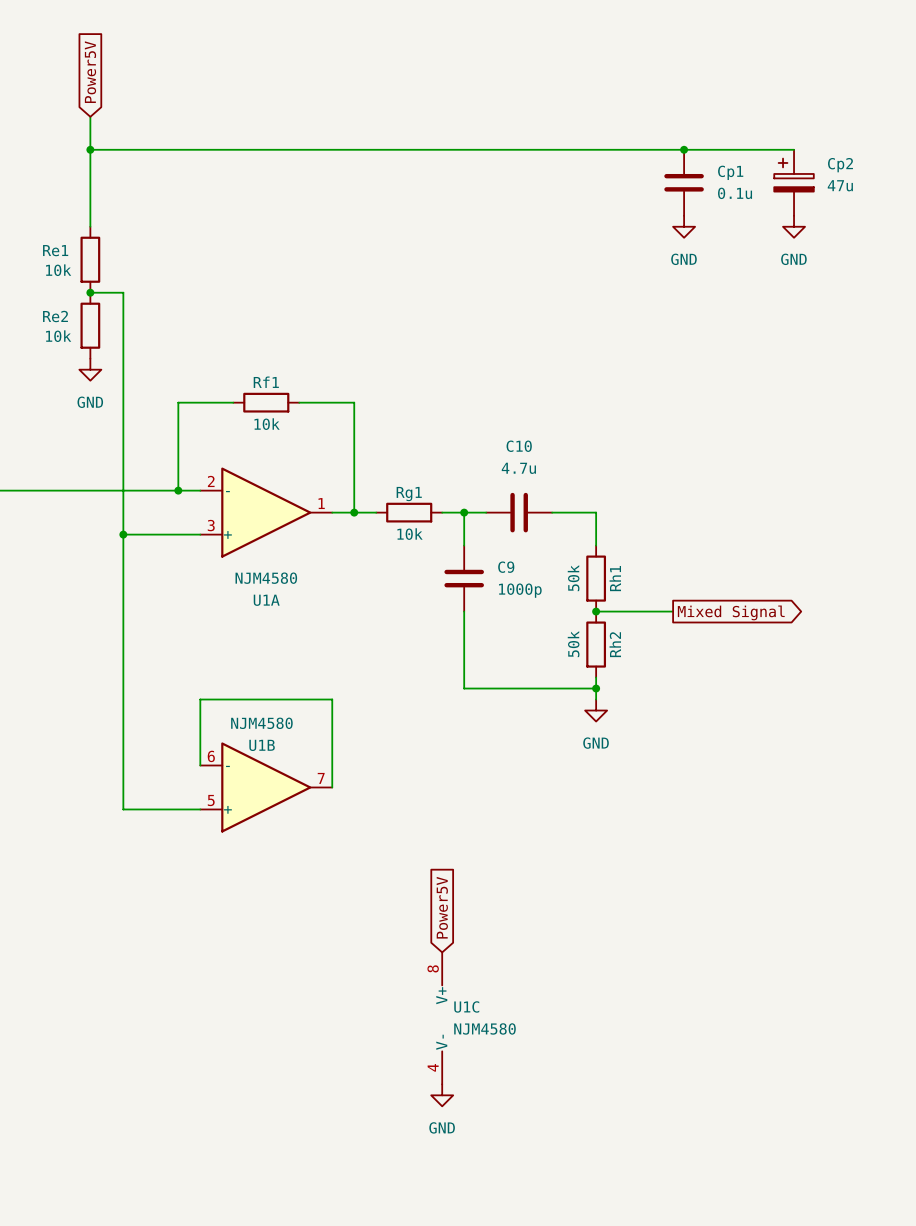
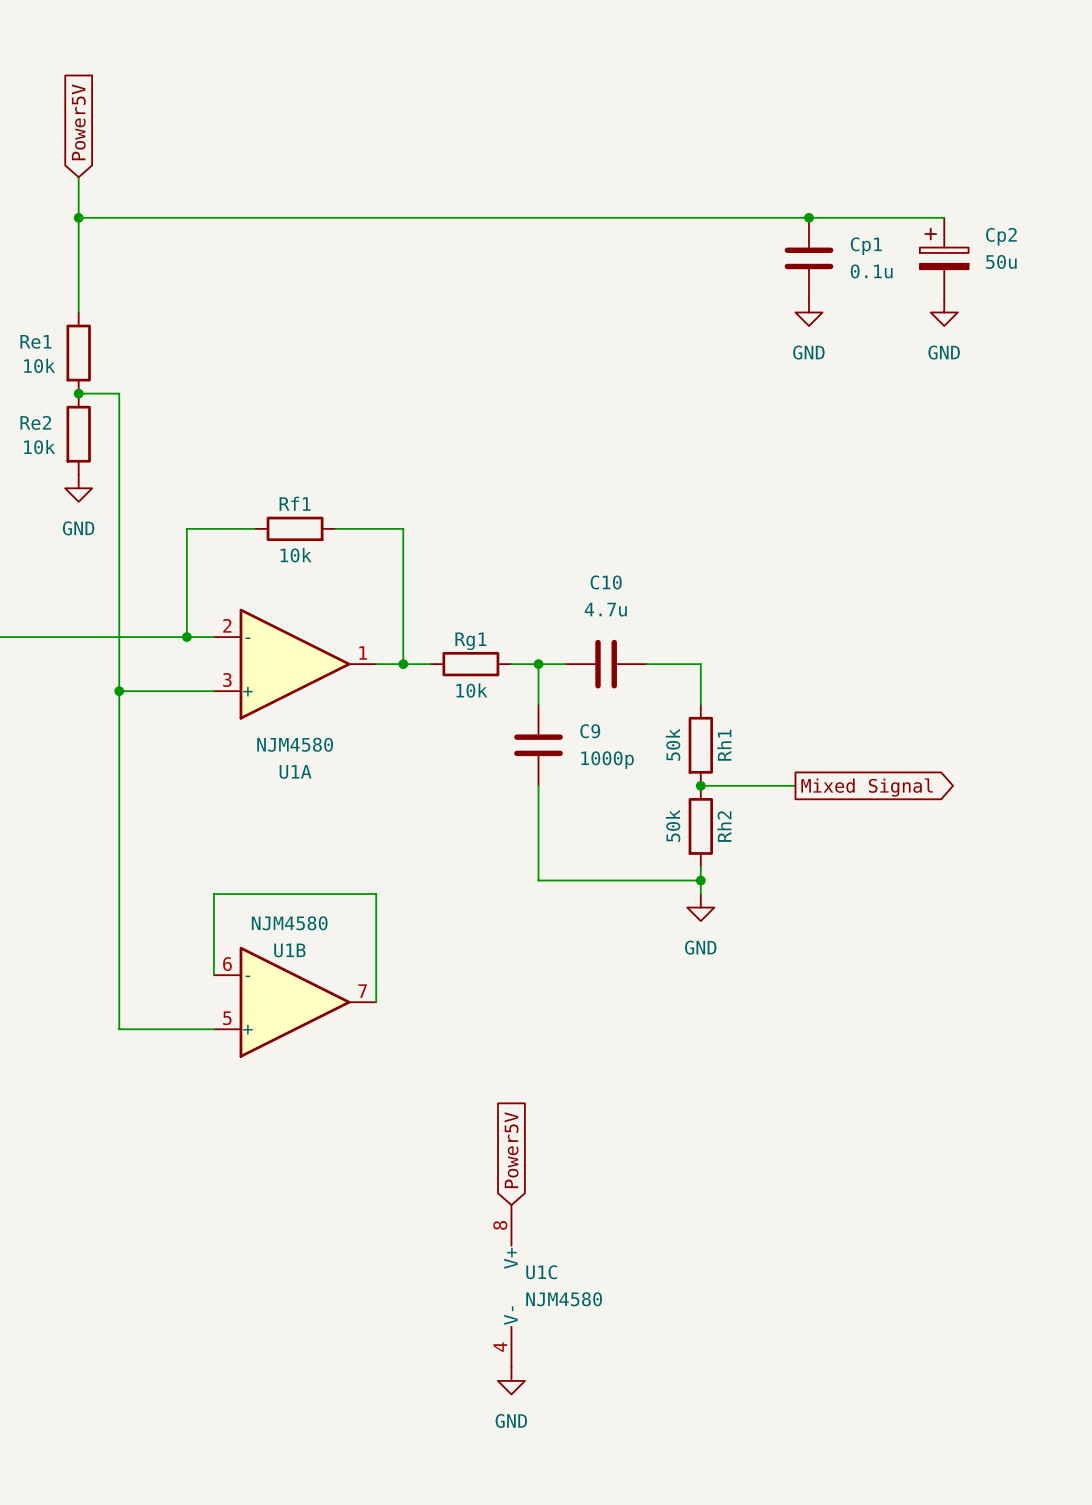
Cp2 value: 47u (840, 185) -> 50u (1001, 261)

